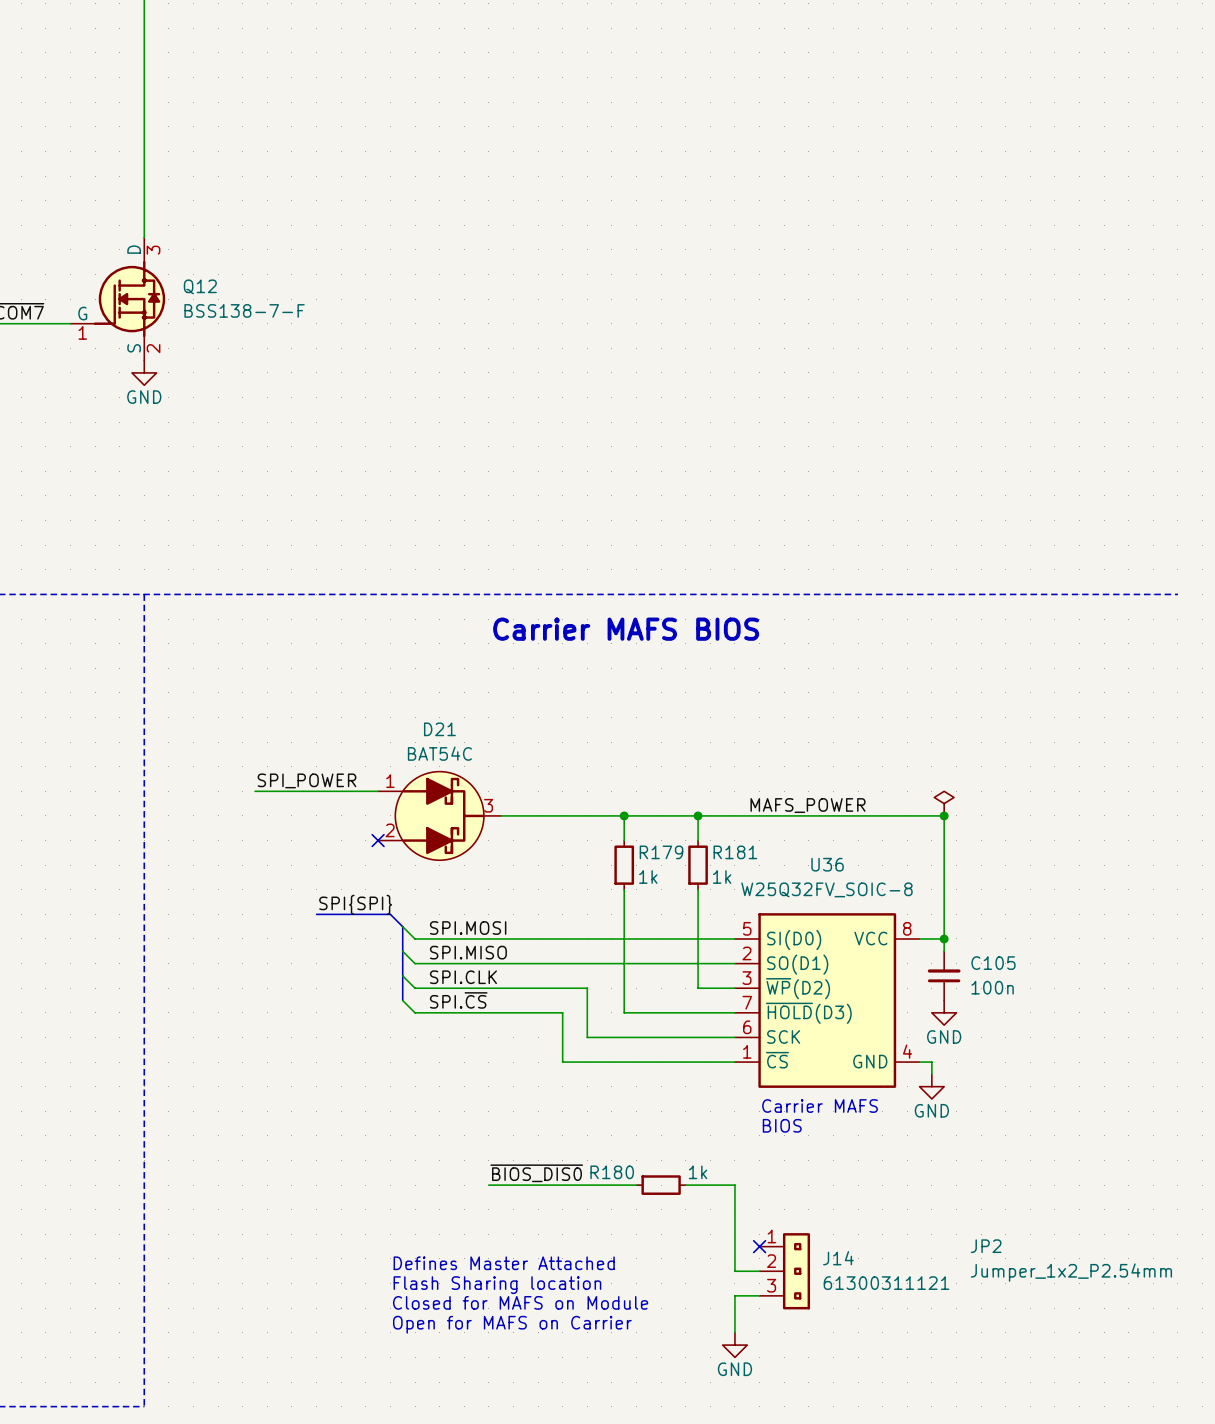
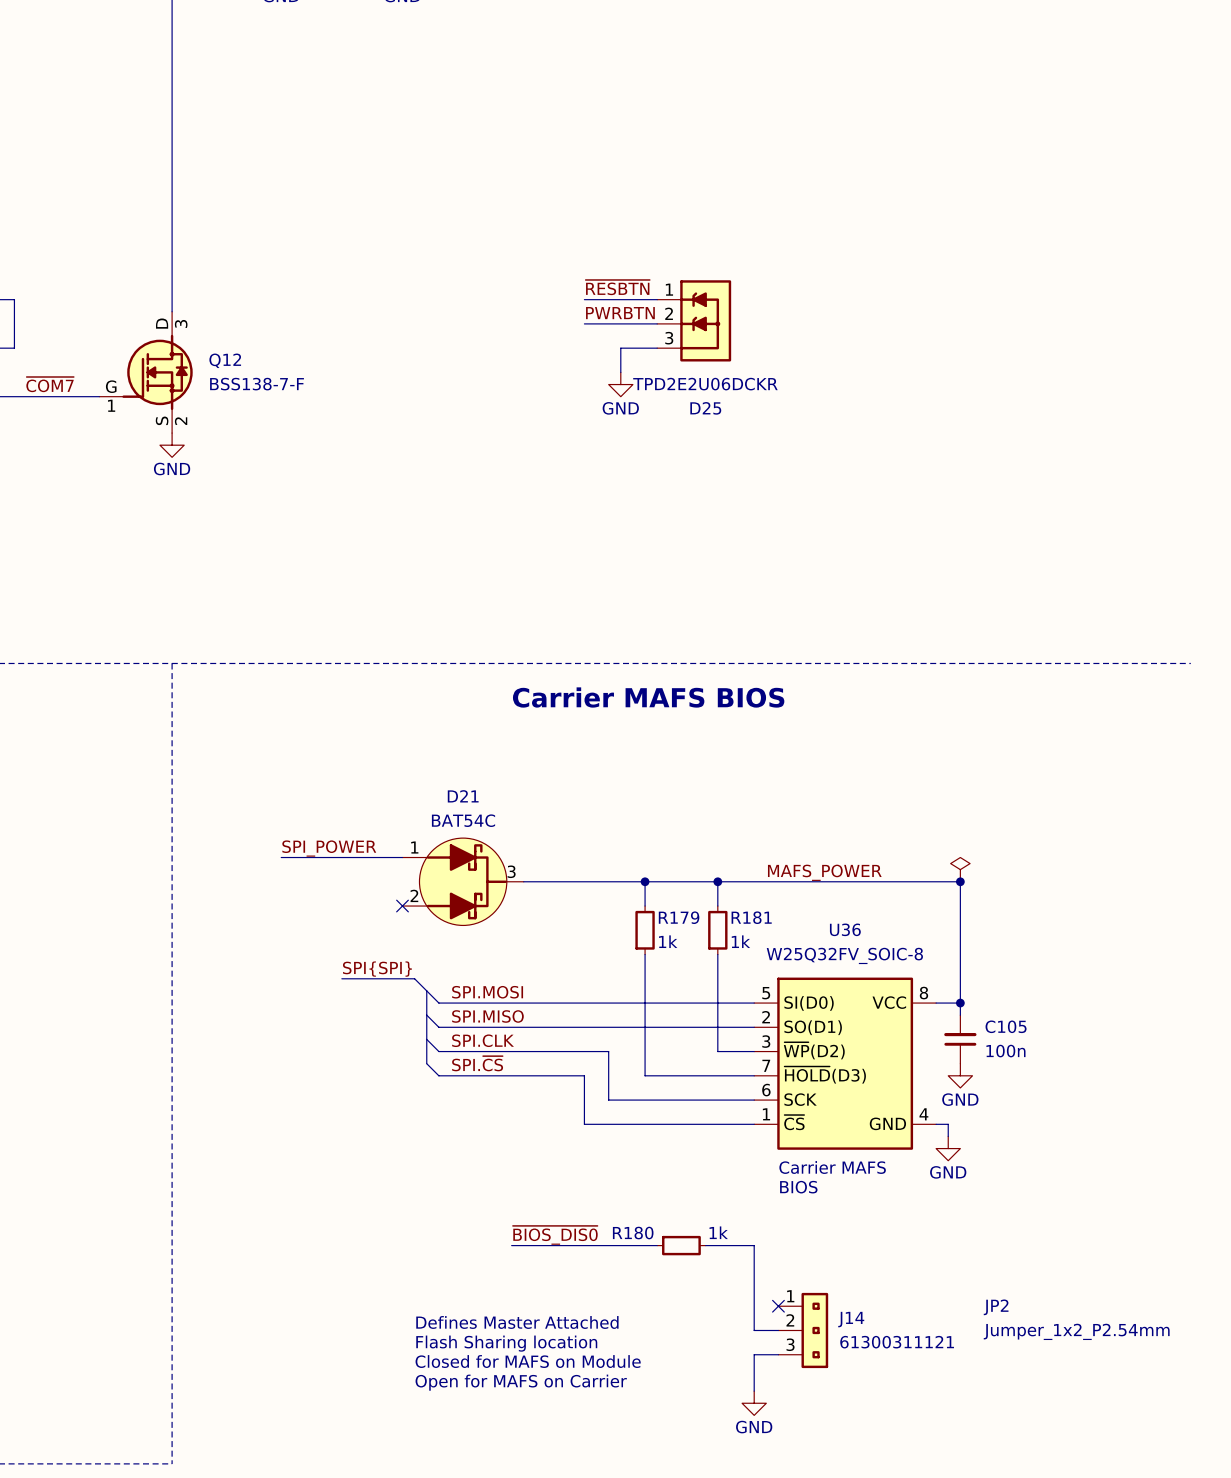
label: none -> ~{RESBTN} (617, 287)
wire: none -> (584, 299) (657, 299)
label: none -> PWRBTN (620, 313)
D25: none -> TPD2E2U06DCKR (694, 320)
wire: none -> (584, 323) (657, 323)
wire: none -> (657, 348) (620, 348) (620, 372)
power symbol: none -> GND (620, 384)

